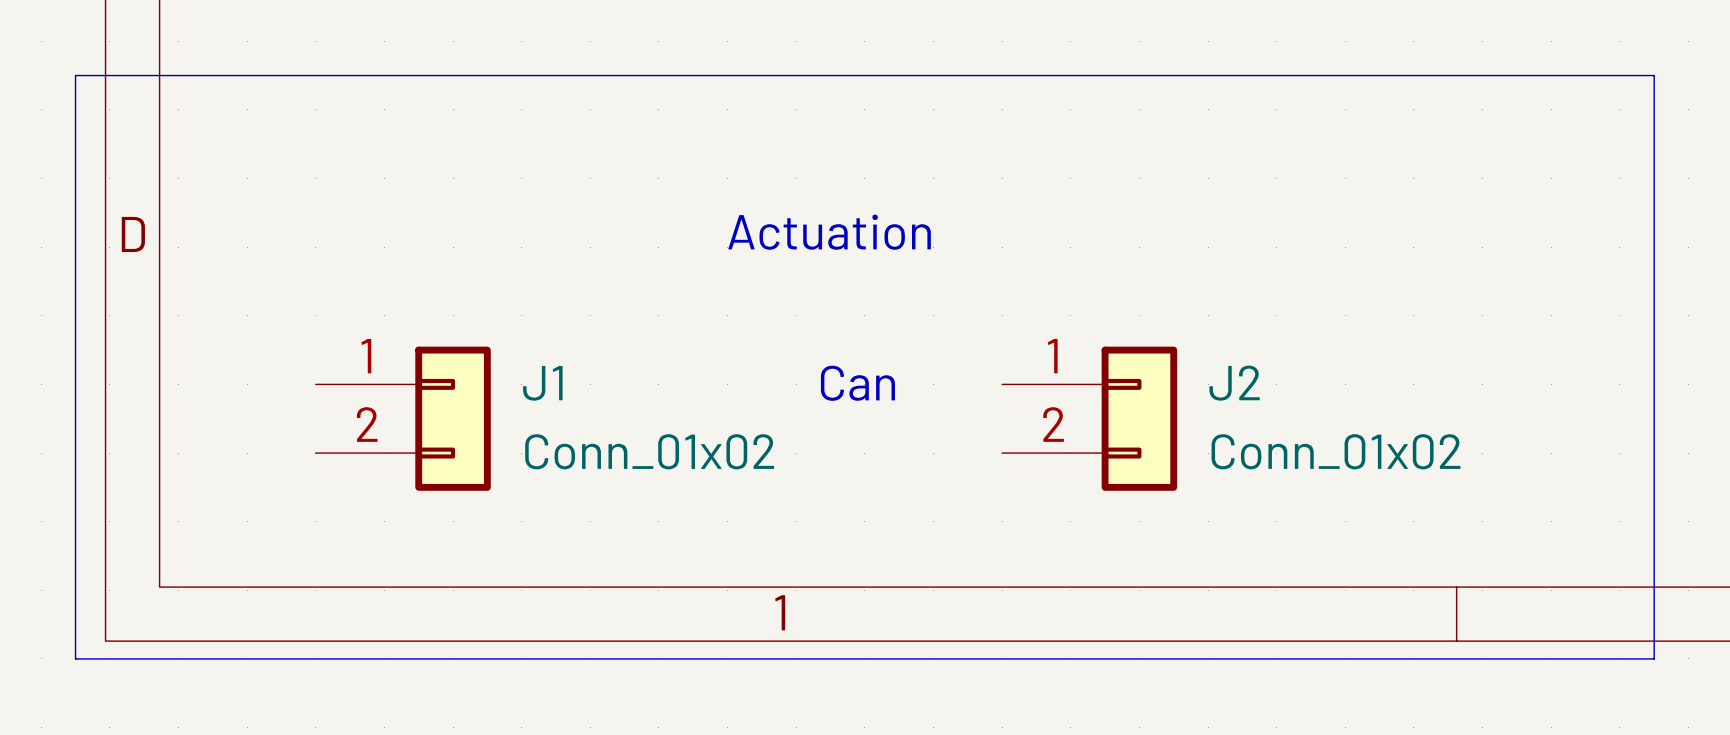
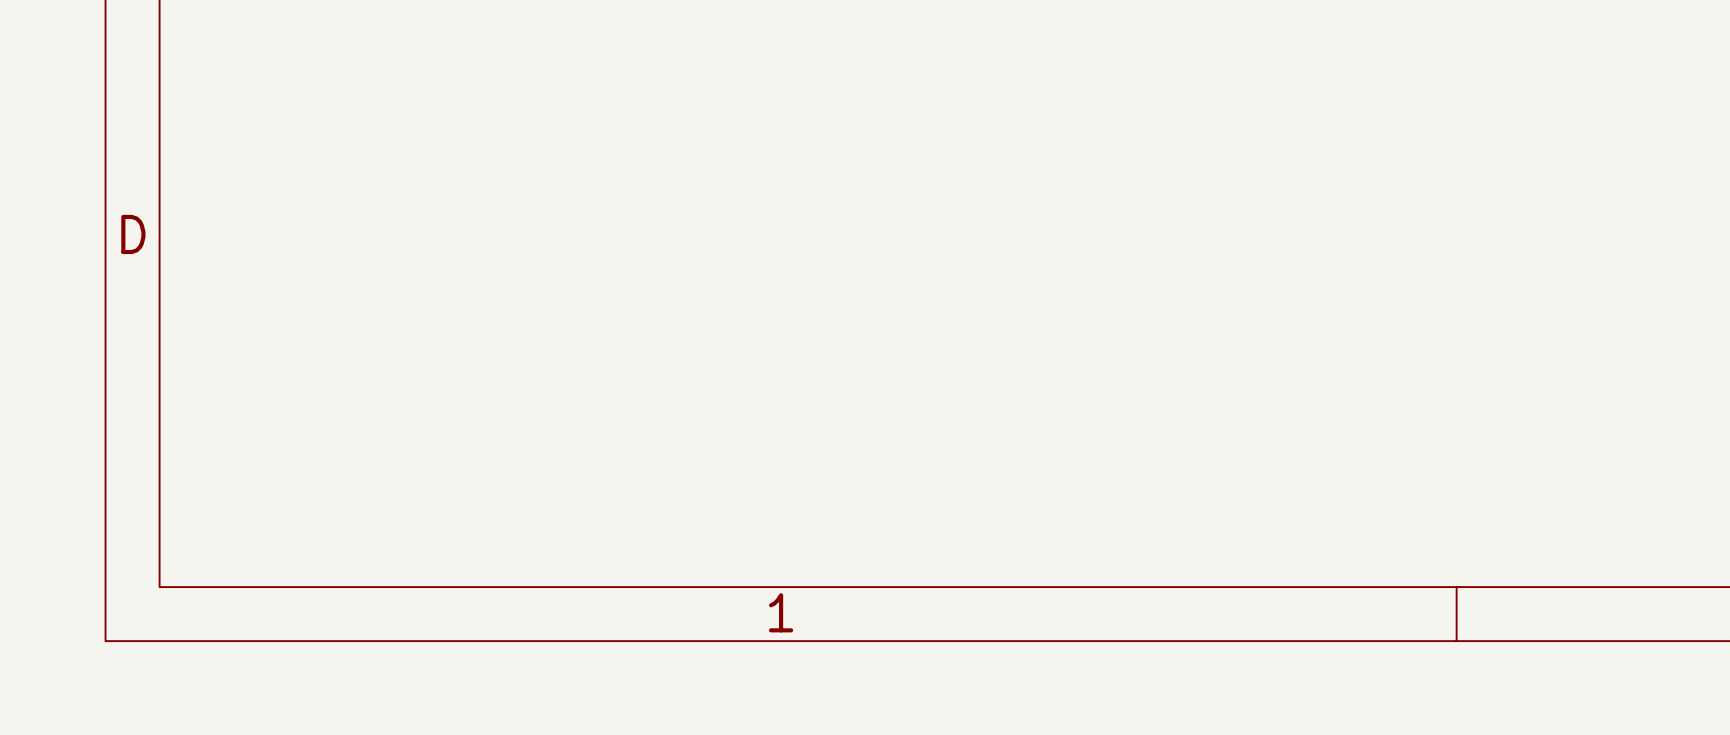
line: (75, 75) (1654, 75) (1654, 658) (75, 658) (75, 75) -> none
text: Actuation (829, 232) -> none
text: Can (857, 383) -> none
J1: Conn_01x02 (403, 418) -> none
J2: Conn_01x02 (1089, 418) -> none

